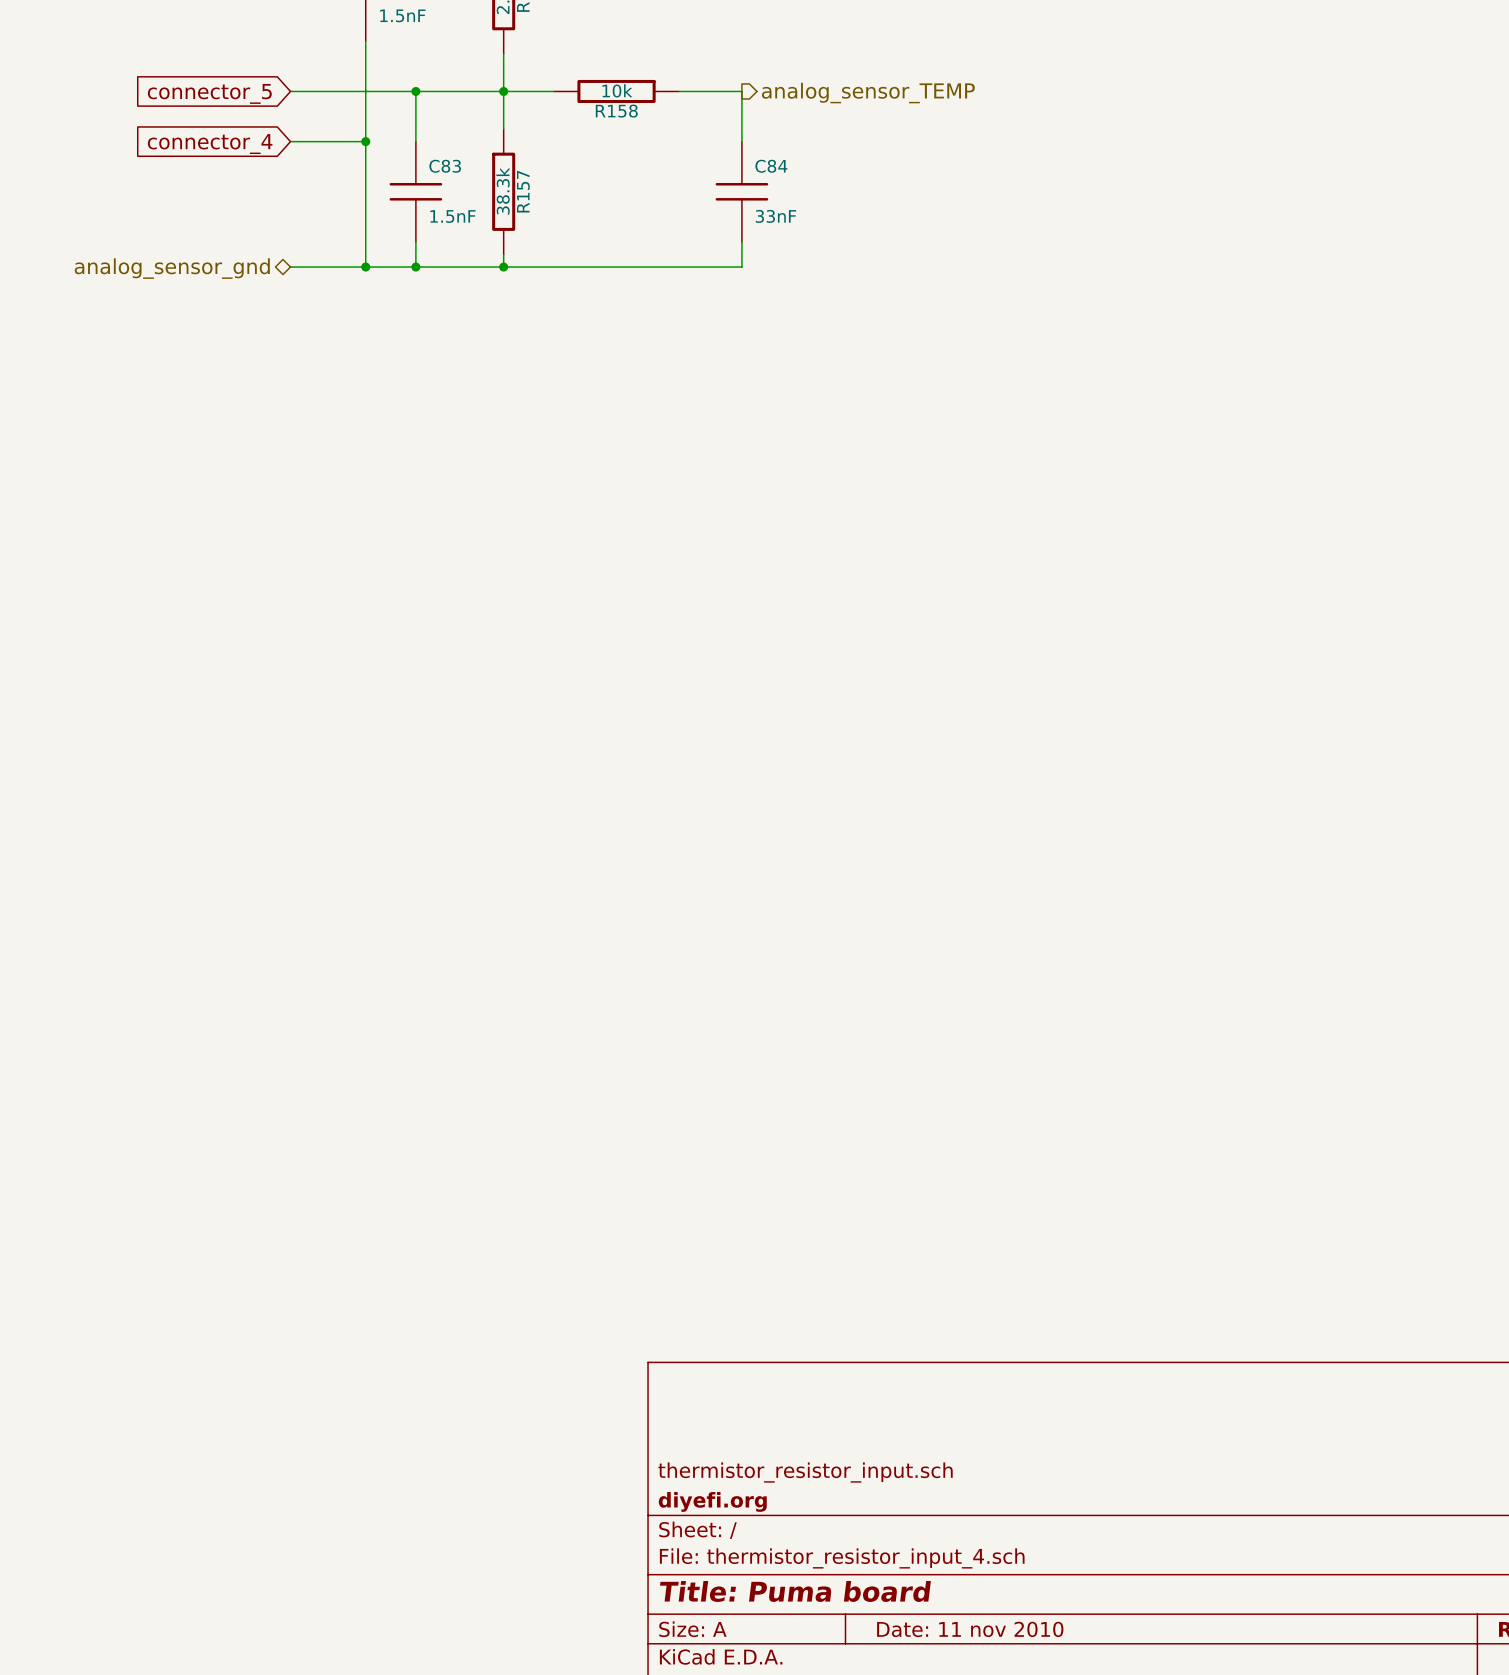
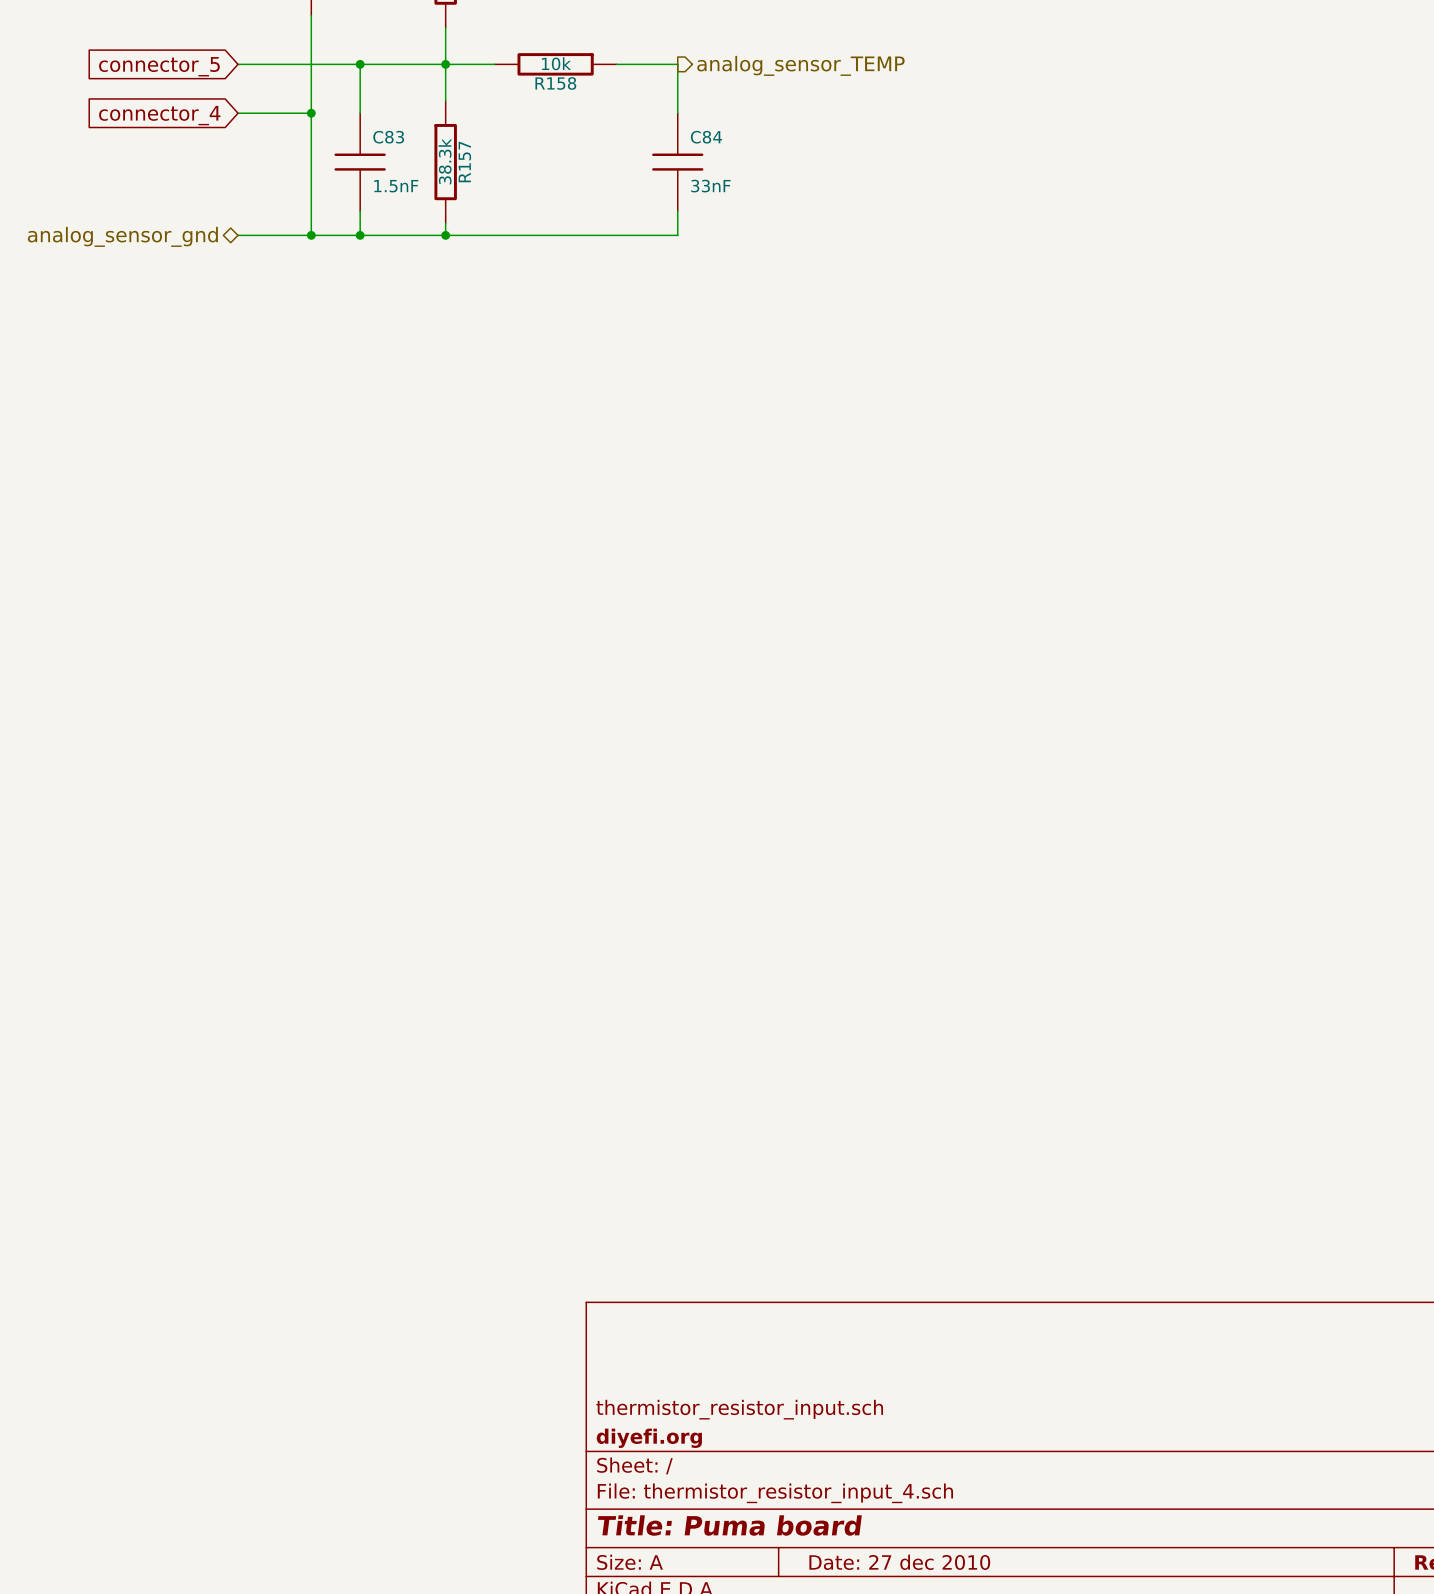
title block: Date: 11 nov 2010 (970, 1629) -> Date: 27 dec 2010 (899, 1562)

